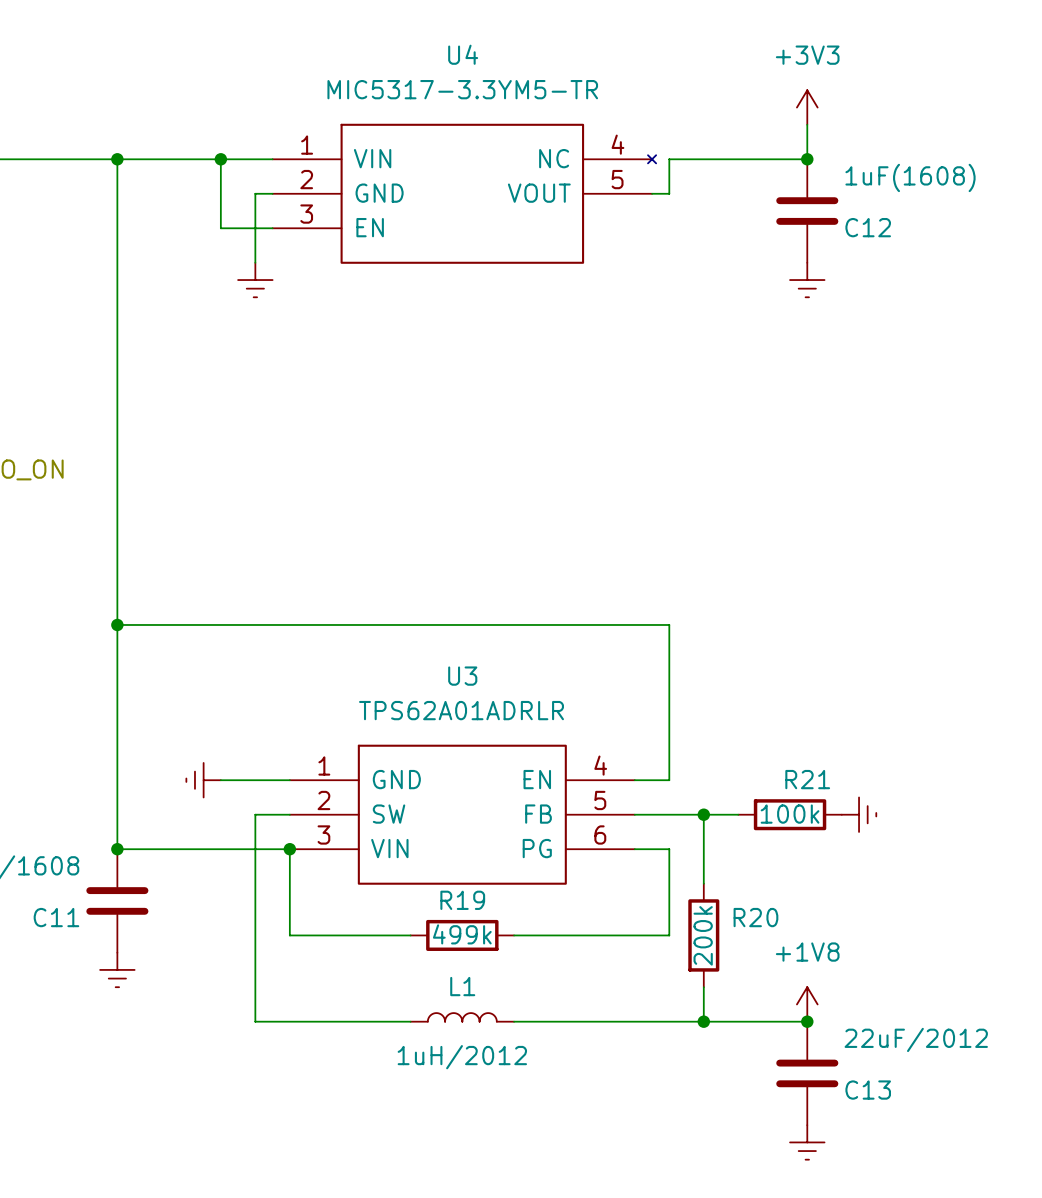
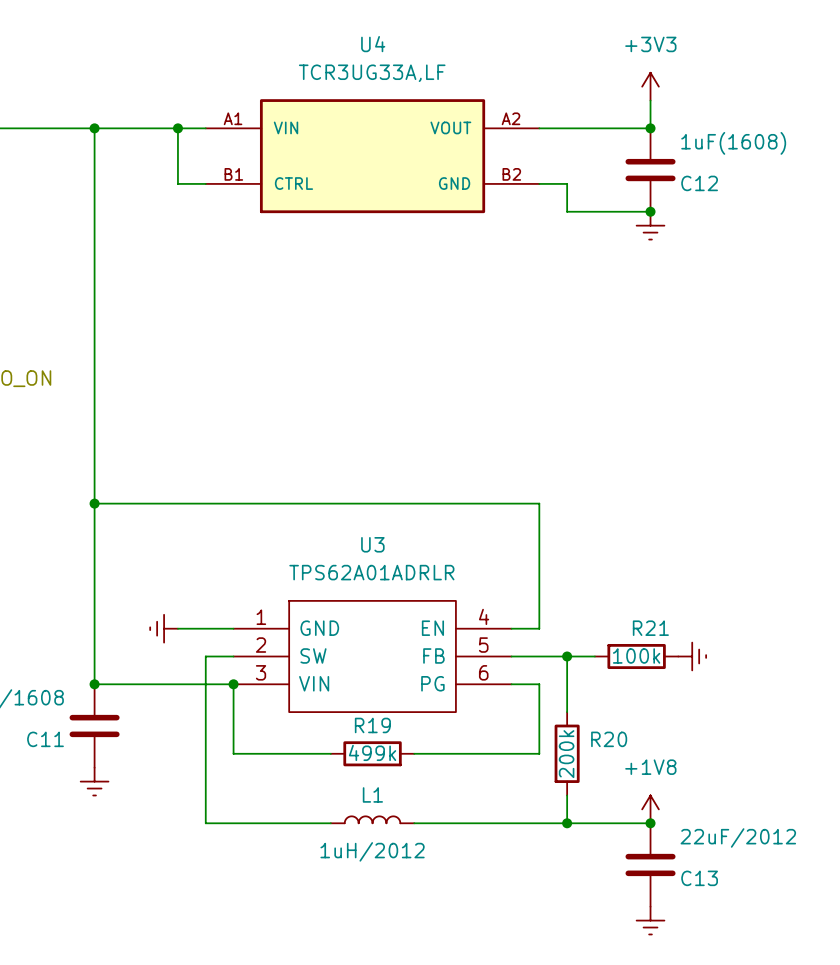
U4 value: MIC5317-3.3YM5-TR (462, 89) -> TCR3UG33A,LF (372, 73)
U4 symbol: [272, 123, 657, 264] -> [205, 99, 540, 214]
wire: (669, 159) (669, 193) (652, 193) -> none
wire: (272, 193) (255, 193) (255, 262) -> none
wire: none -> (539, 183) (567, 183) (567, 211) (650, 211)
junction: none -> (650, 211)
power symbol: (255, 280) -> none

